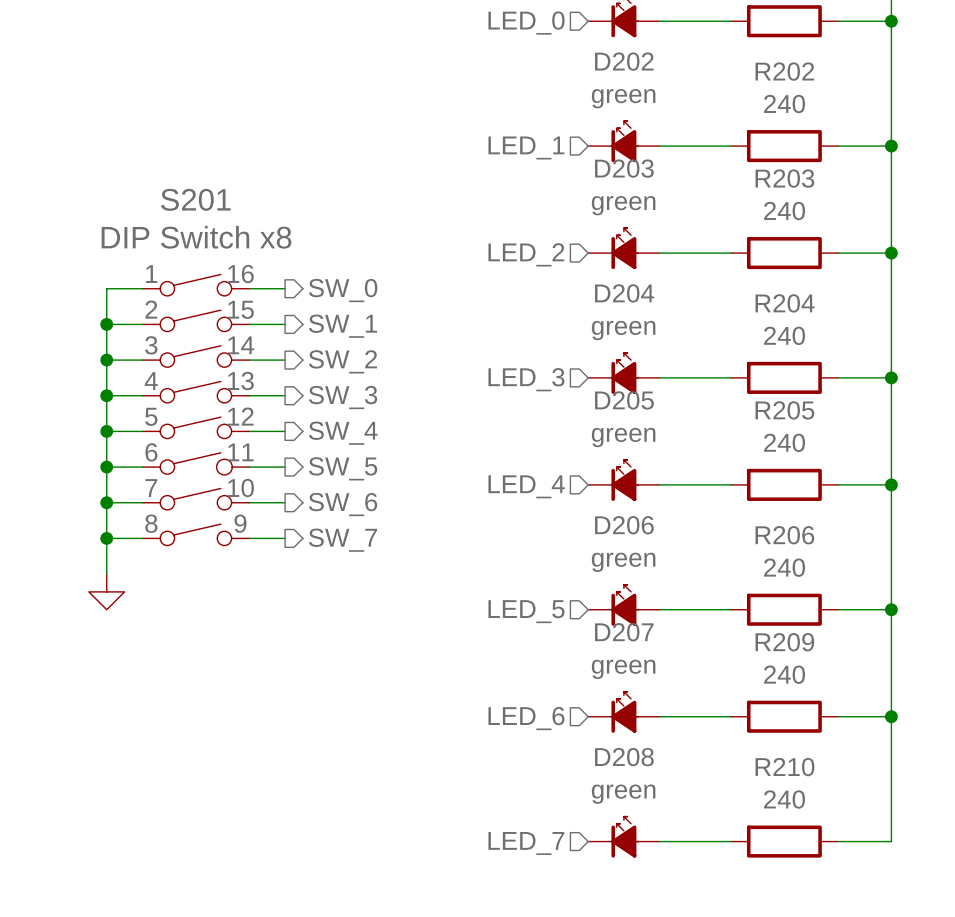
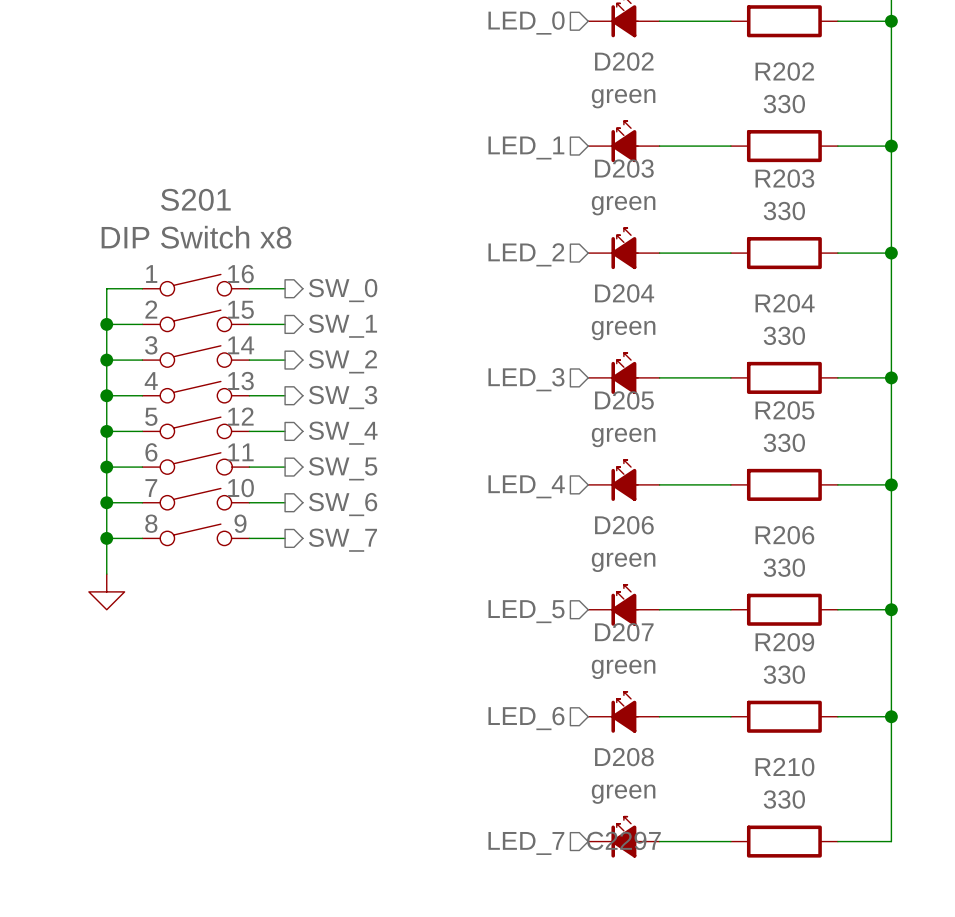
R202 value: 240 (784, 104) -> 330 (784, 104)
R203 value: 240 (784, 211) -> 330 (784, 211)
R204 value: 240 (784, 335) -> 330 (784, 335)
R205 value: 240 (784, 442) -> 330 (784, 442)
R206 value: 240 (784, 567) -> 330 (784, 567)
R209 value: 240 (784, 674) -> 330 (784, 674)
R210 value: 240 (784, 799) -> 330 (784, 799)
D208 text: none -> C2297 (623, 840)

